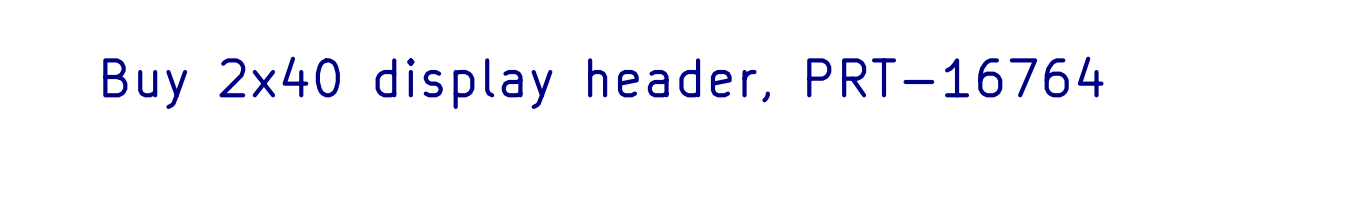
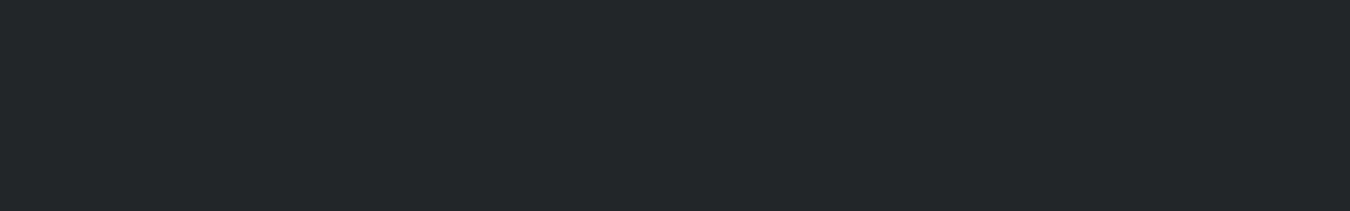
text: Buy 2x40 display header, PRT-16764 (603, 82) -> none

